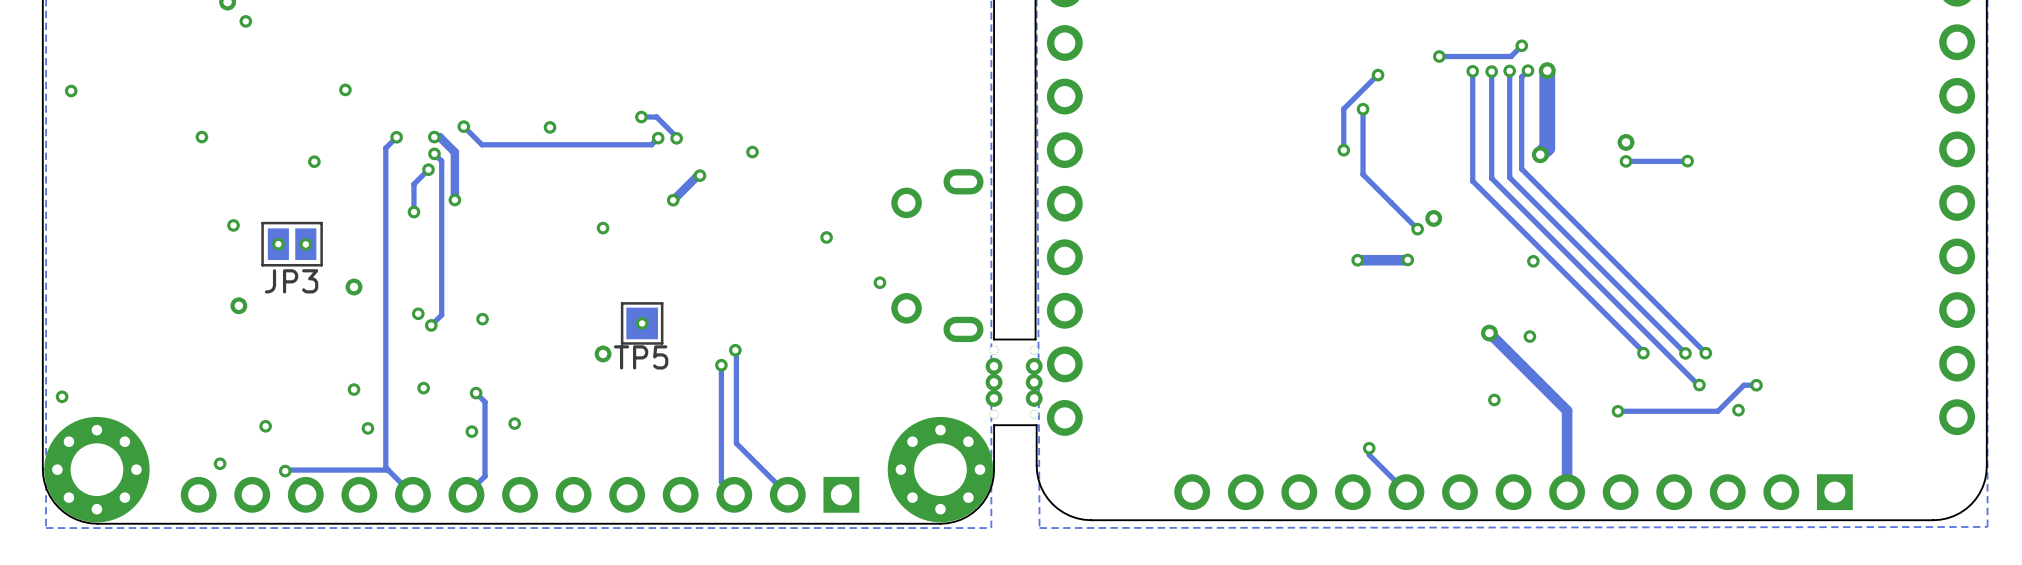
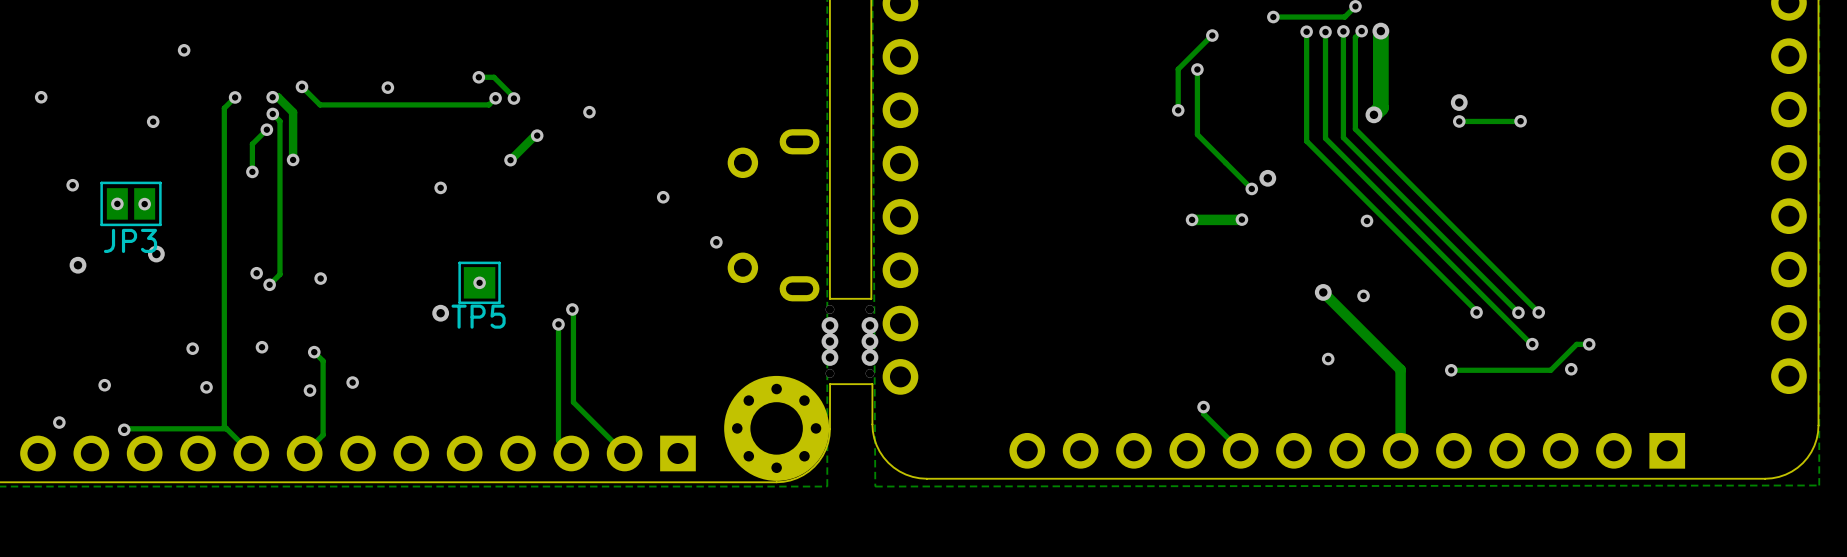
via position: (354, 287) -> (156, 254)

